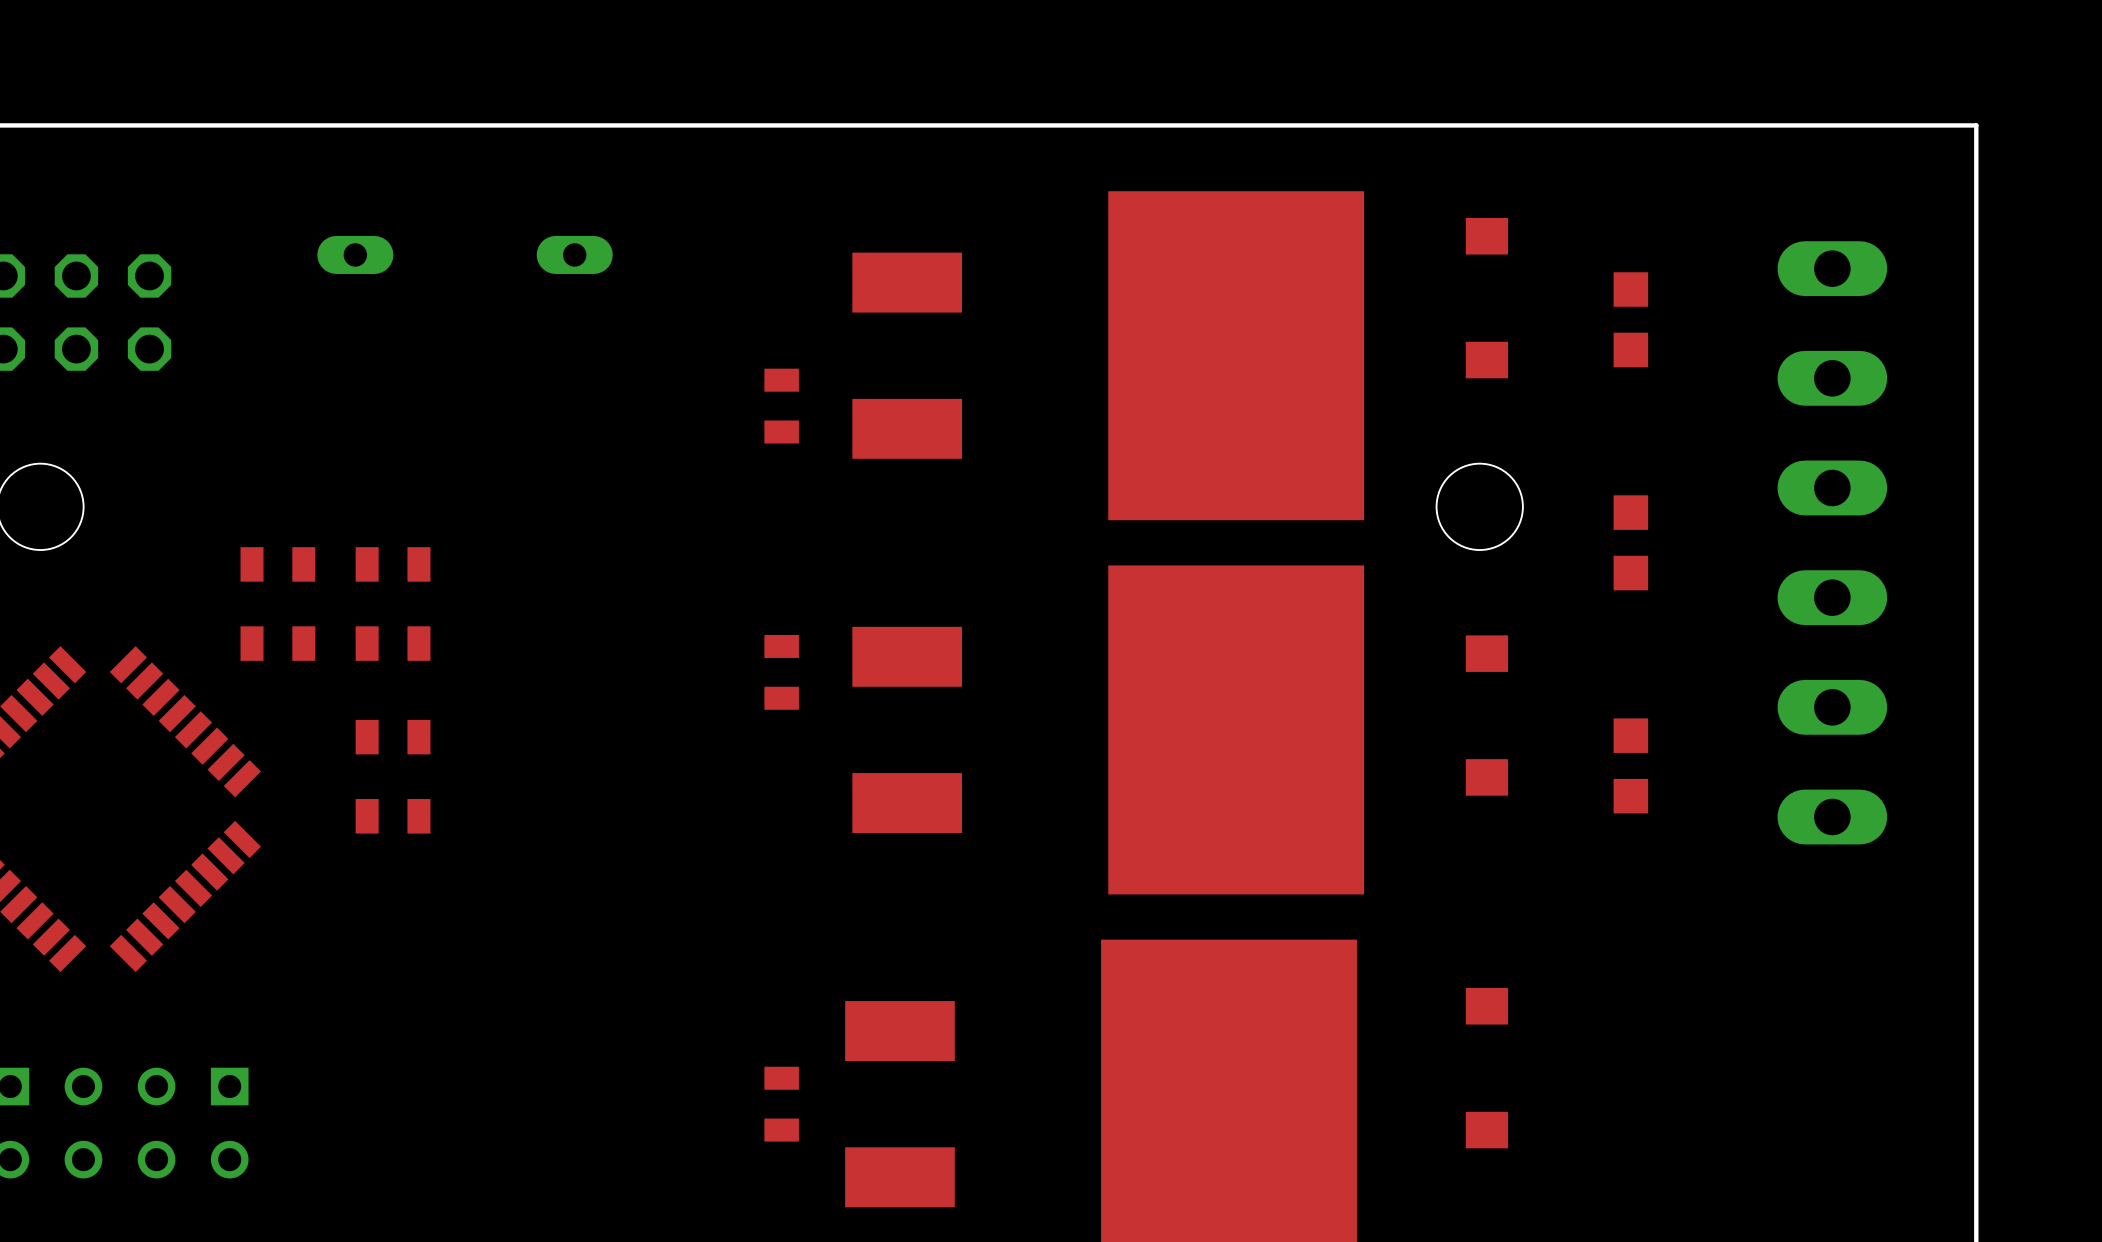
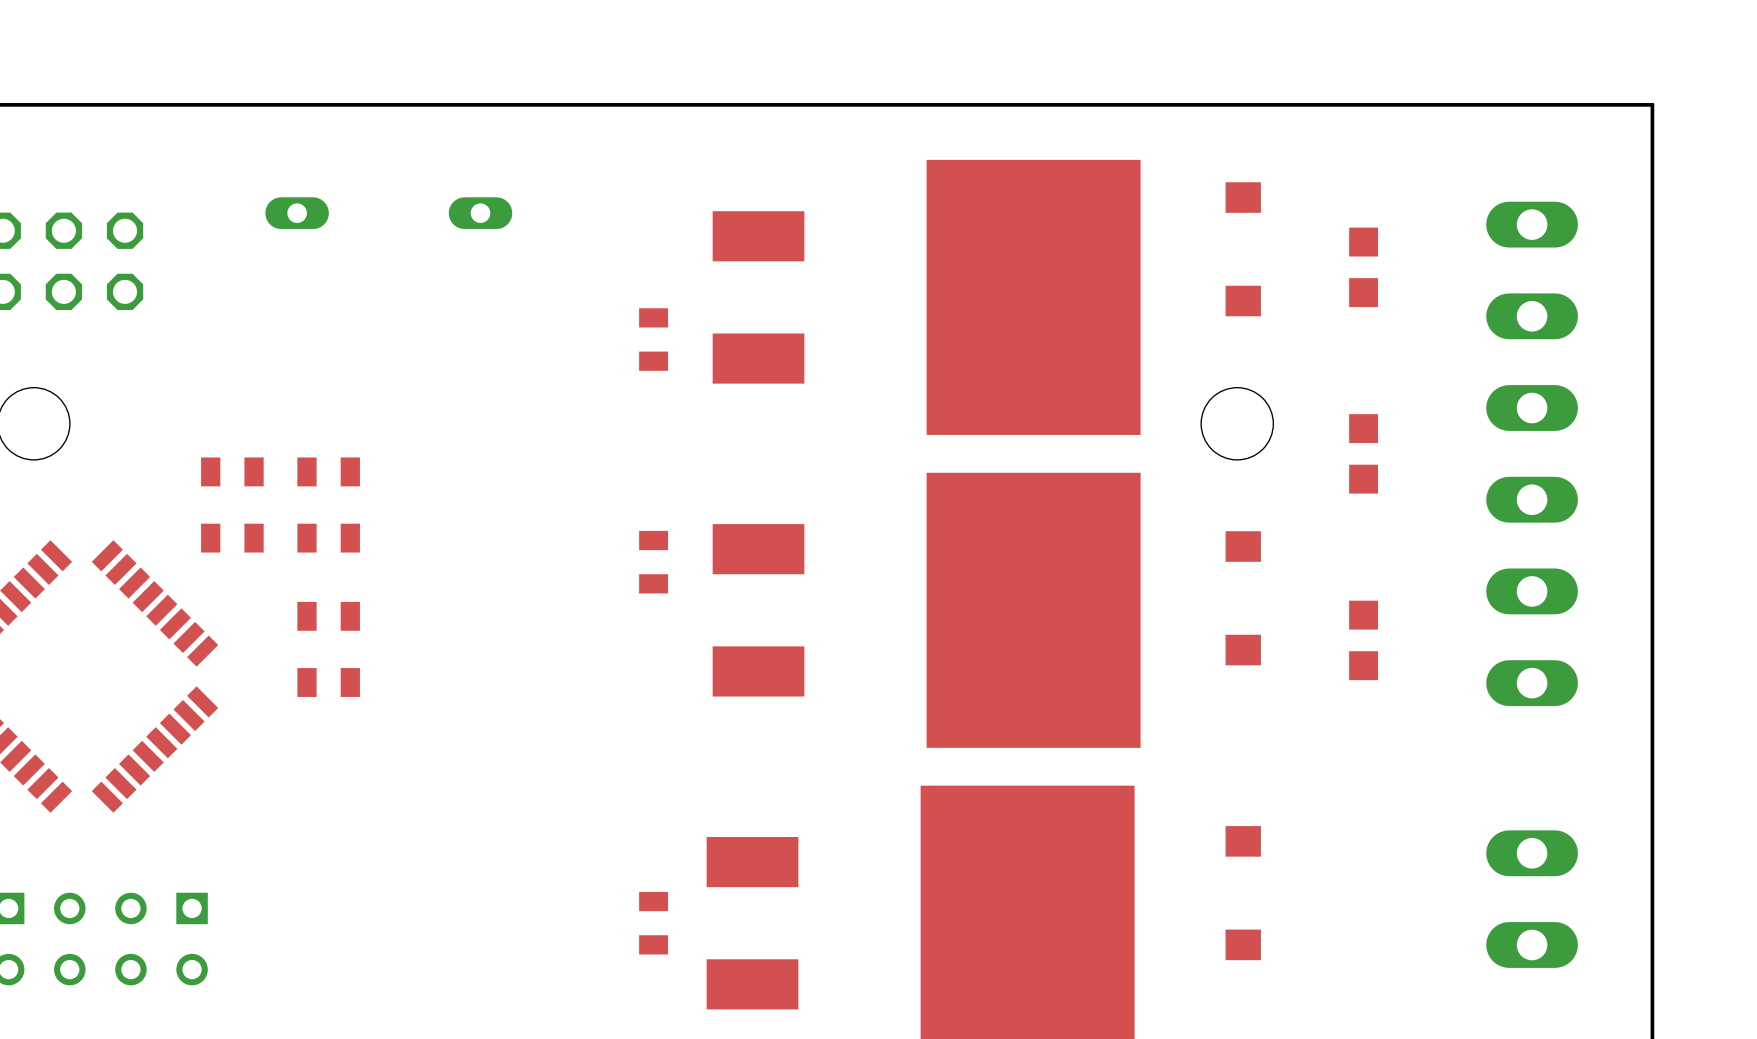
part: none -> (1532, 899)

